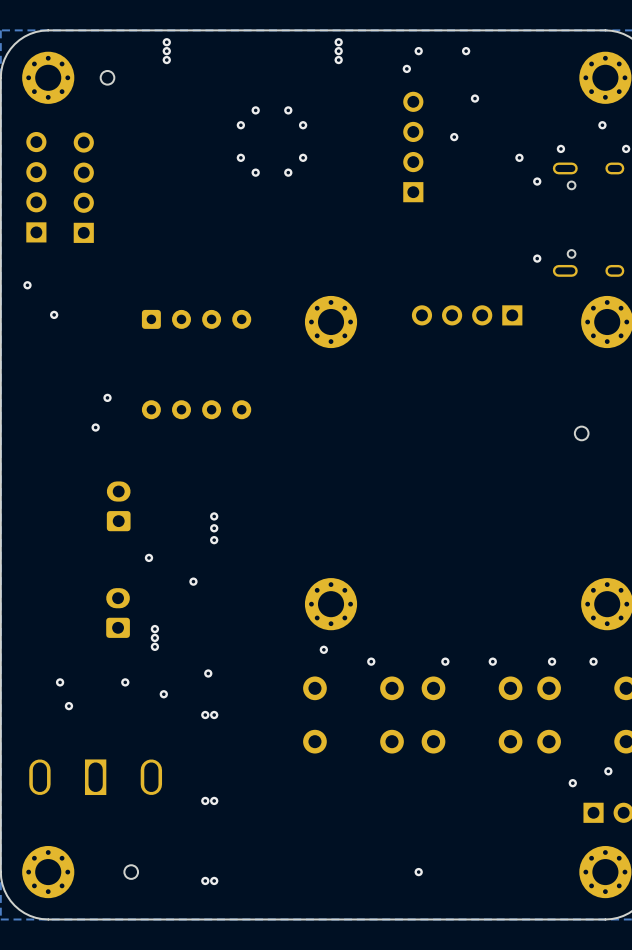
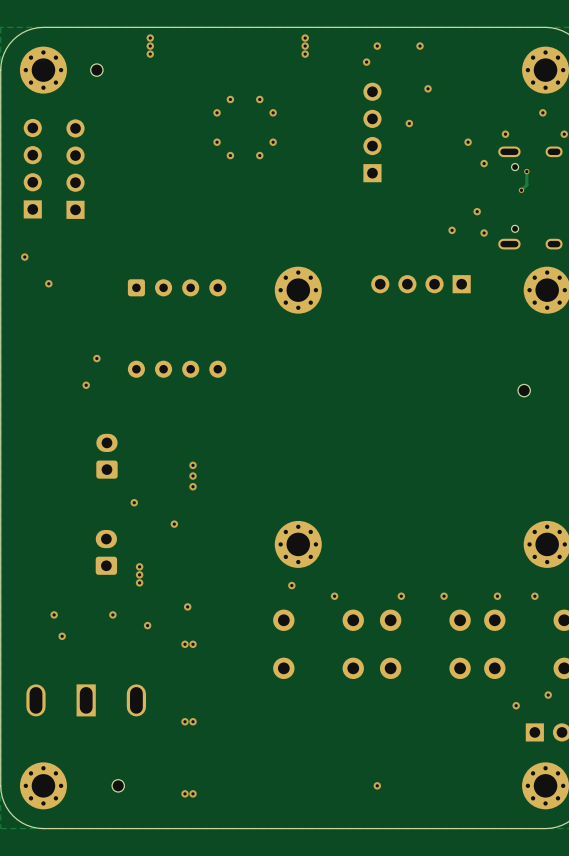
track: none -> (526, 171) (526, 184) (521, 190)
via: none -> (526, 171)
via: none -> (521, 190)
via: none -> (477, 211)
via: none -> (452, 230)

